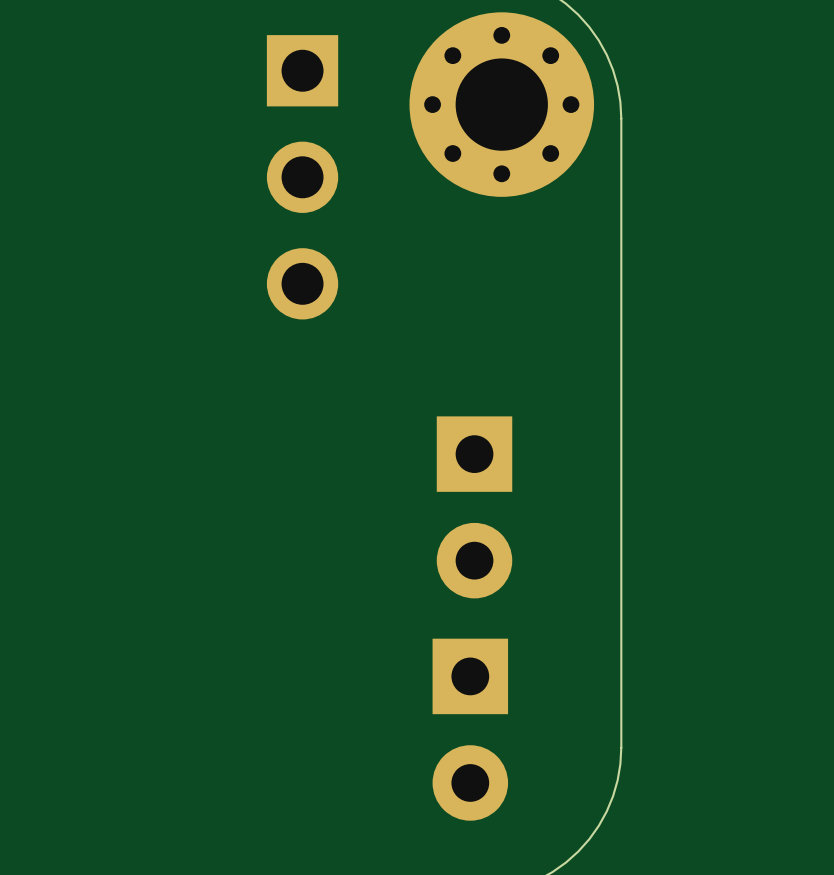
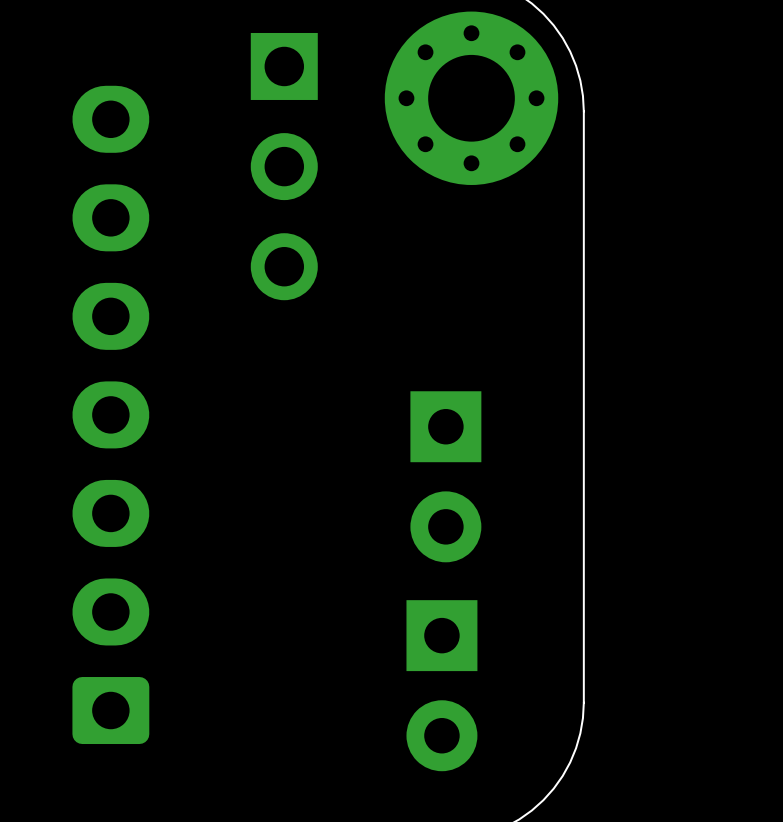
part: none -> (110, 414)

